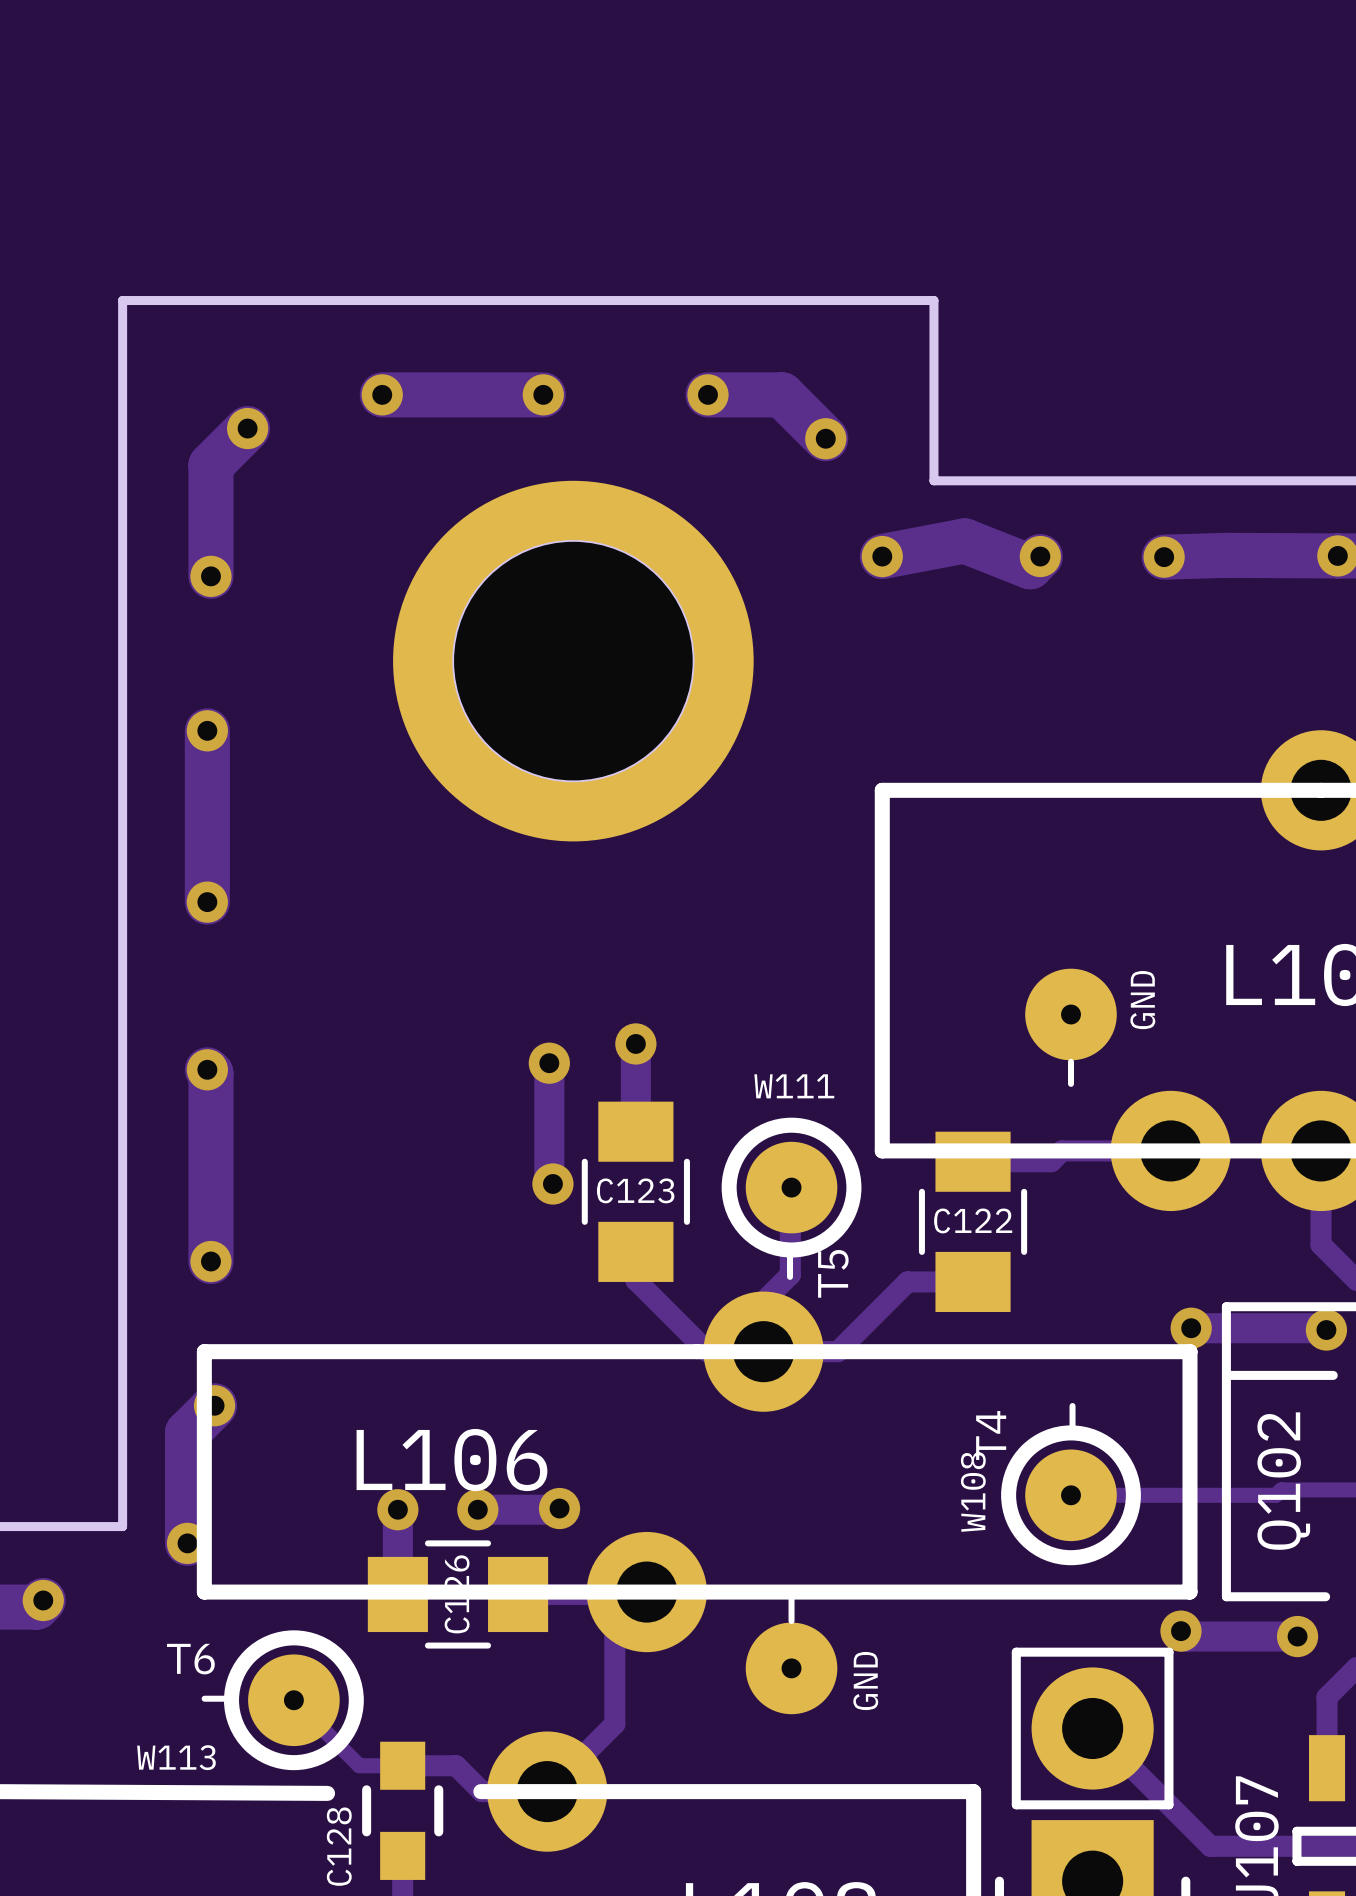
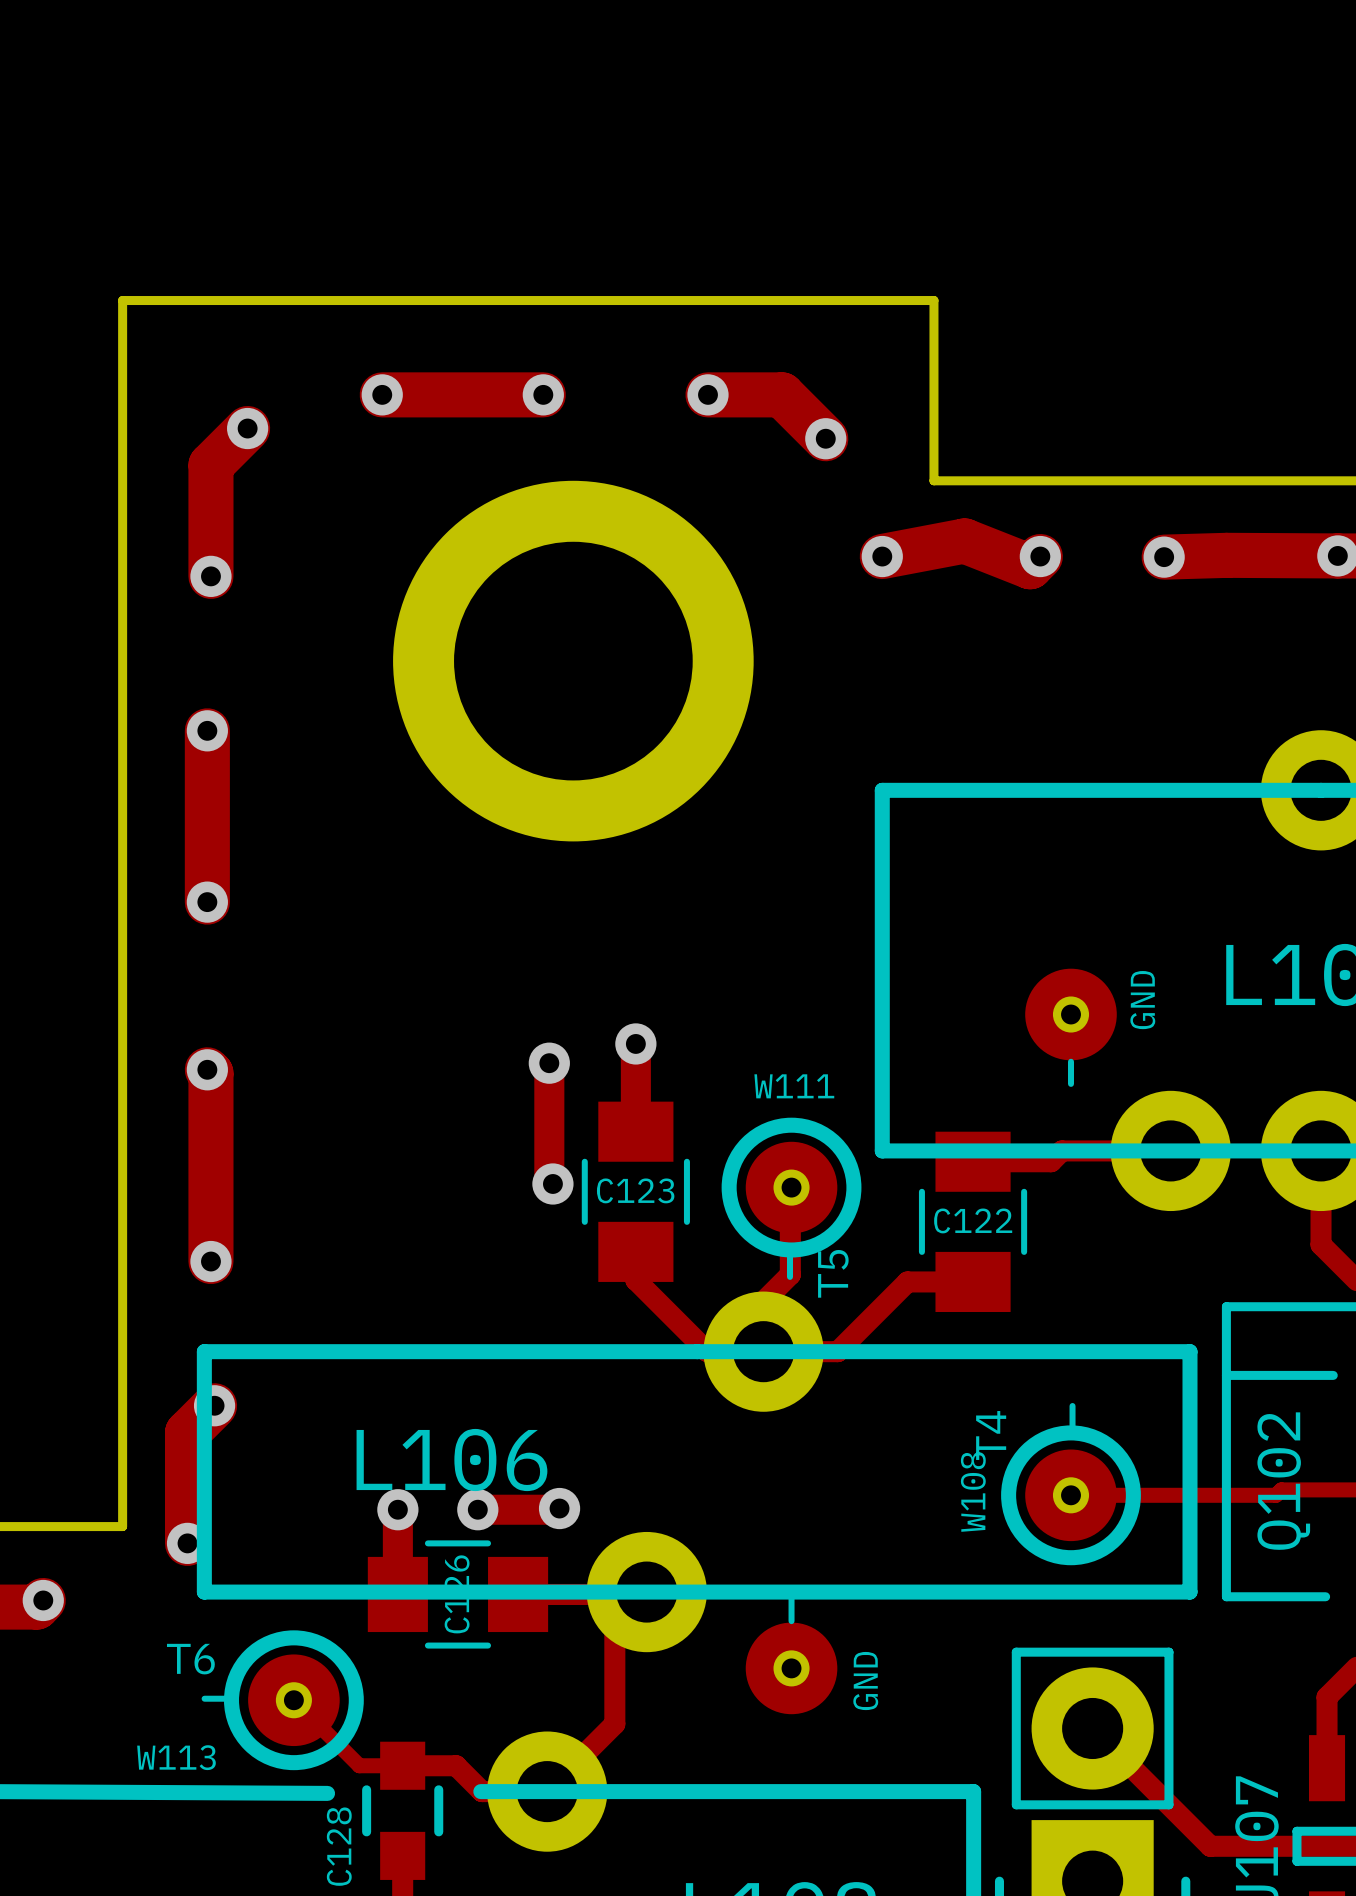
track: (1191, 1328) (1324, 1328) (1326, 1330) -> none
via: (1191, 1328) -> none
via: (1326, 1330) -> none
track: (1180, 1631) (1186, 1636) (1297, 1636) -> none
via: (1180, 1631) -> none
via: (1297, 1636) -> none

